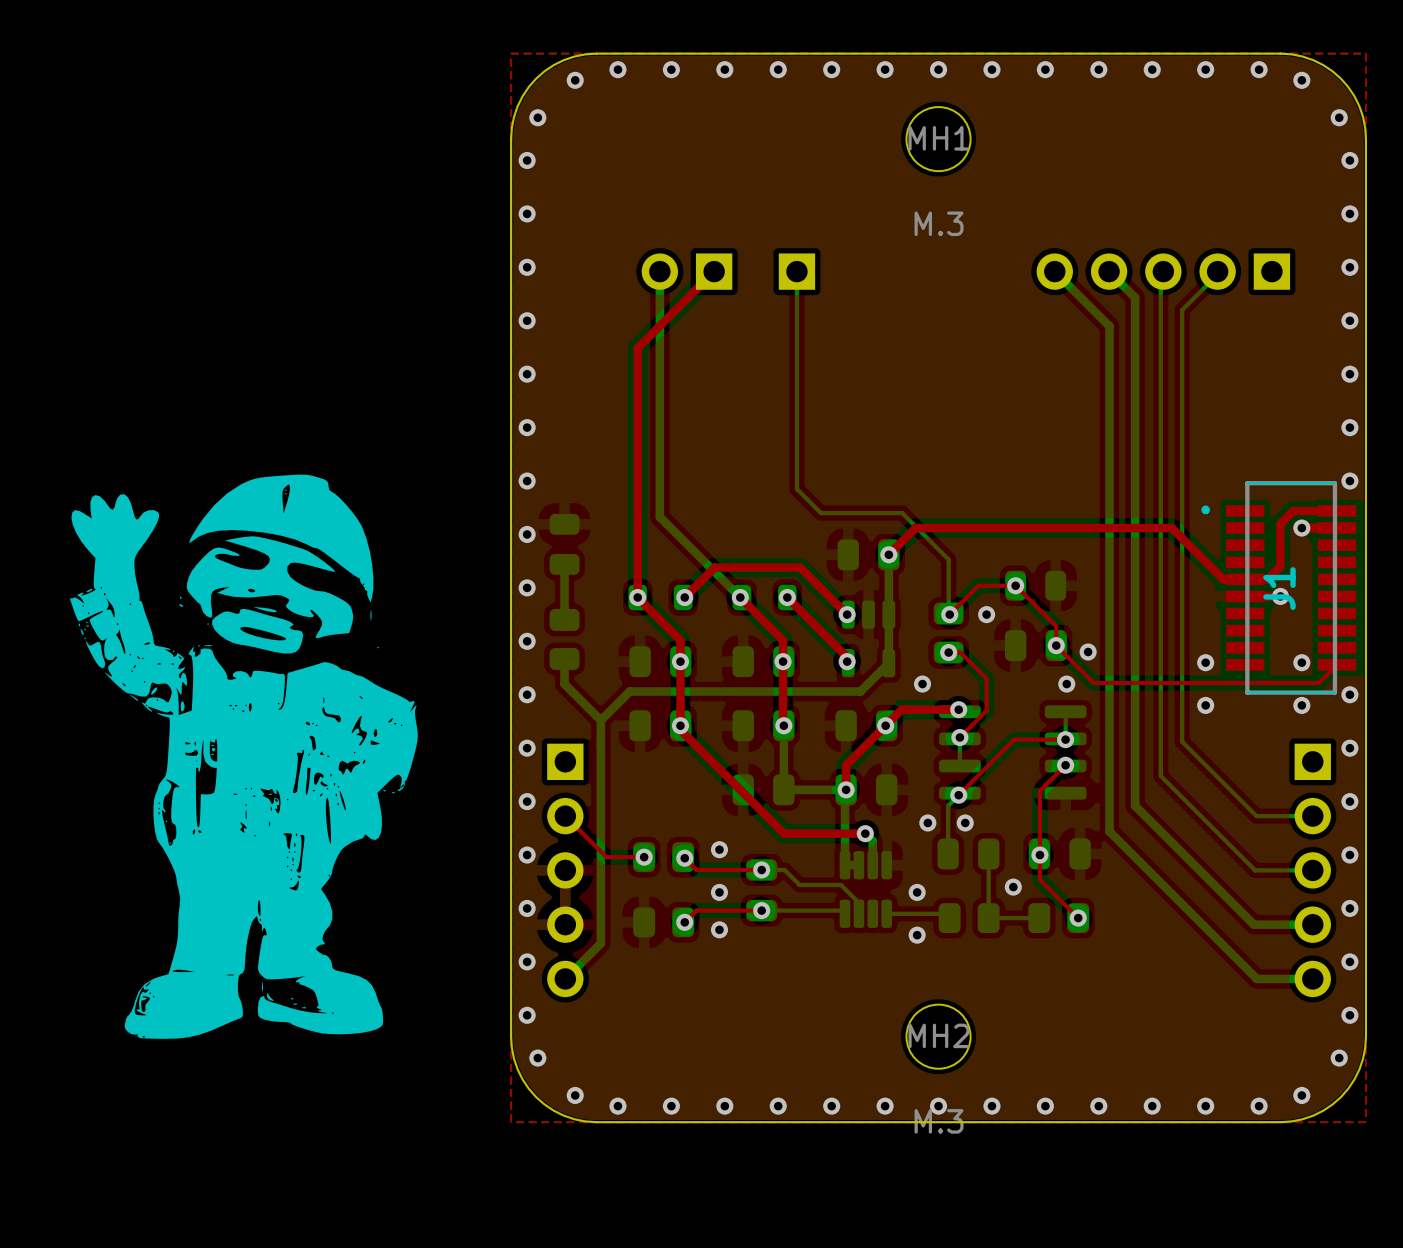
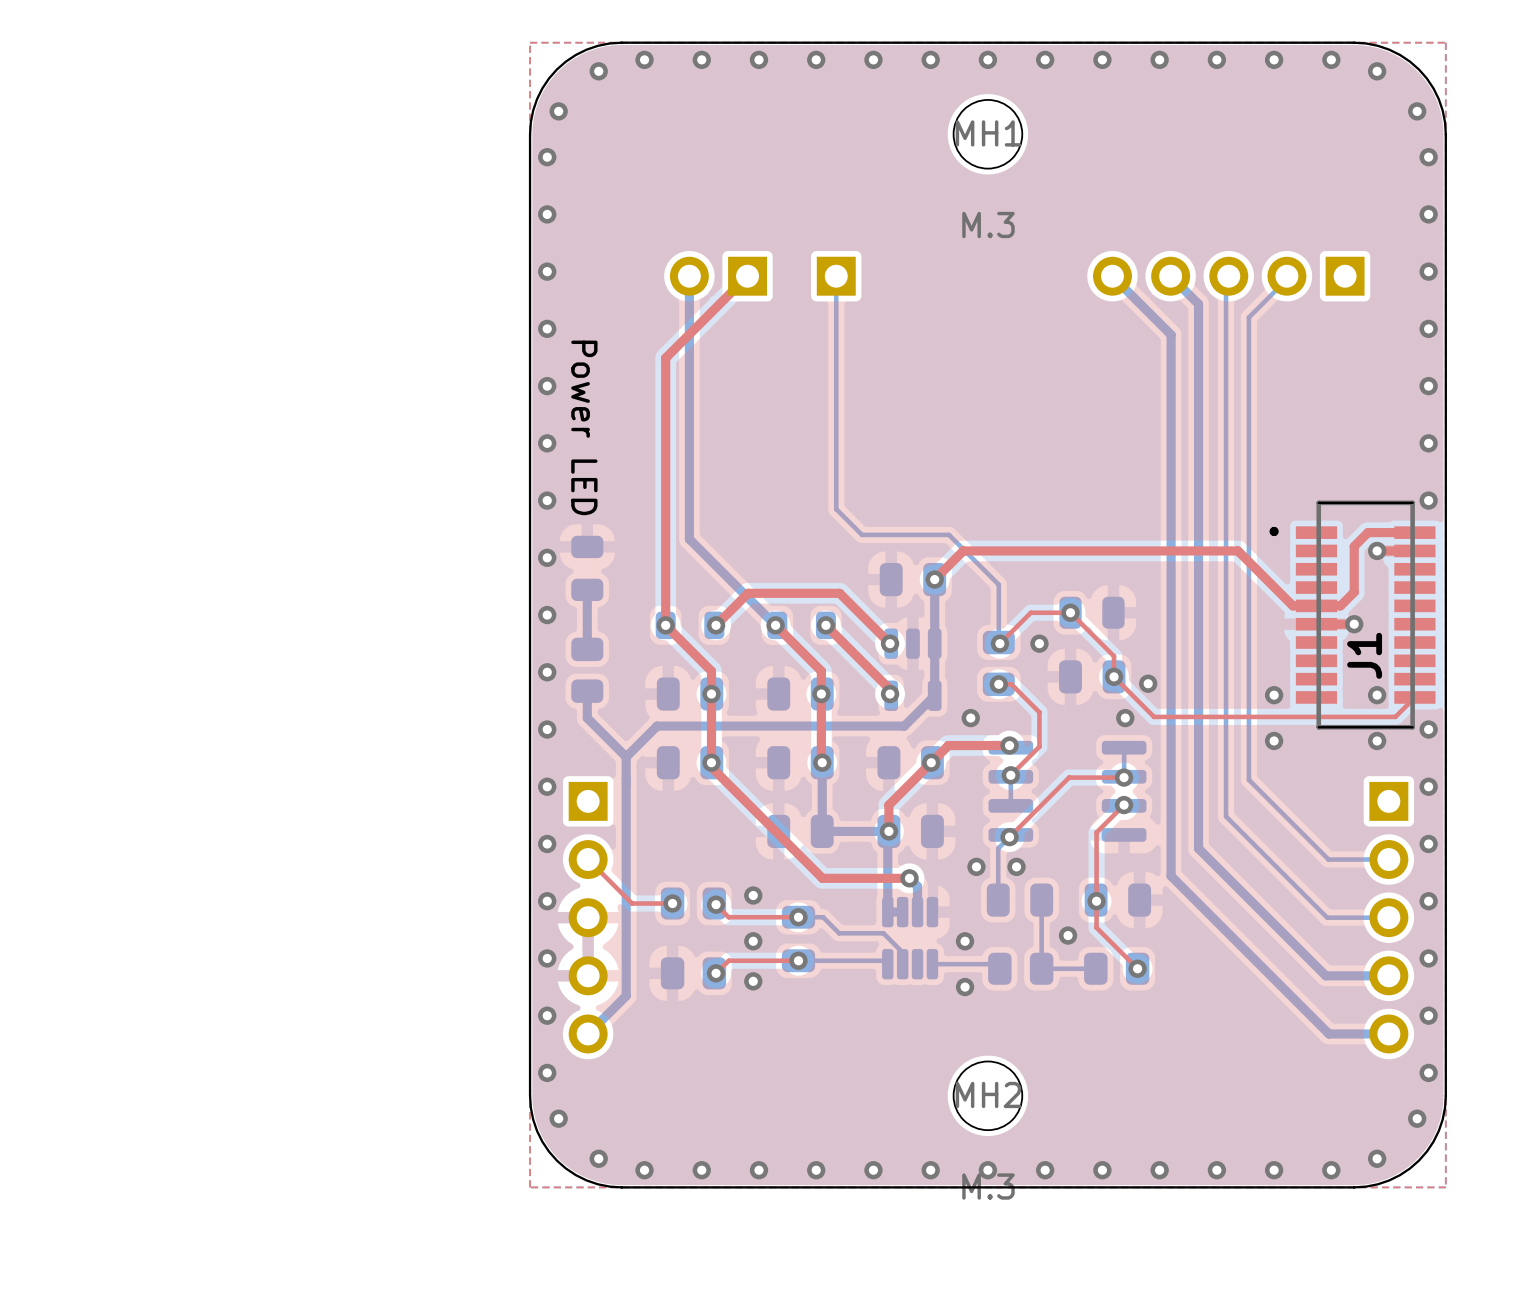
text: none -> Power LED (584, 427)
J1 name position: J1 (1279, 588) -> J1 (1364, 655)
part: (243, 756) -> none

